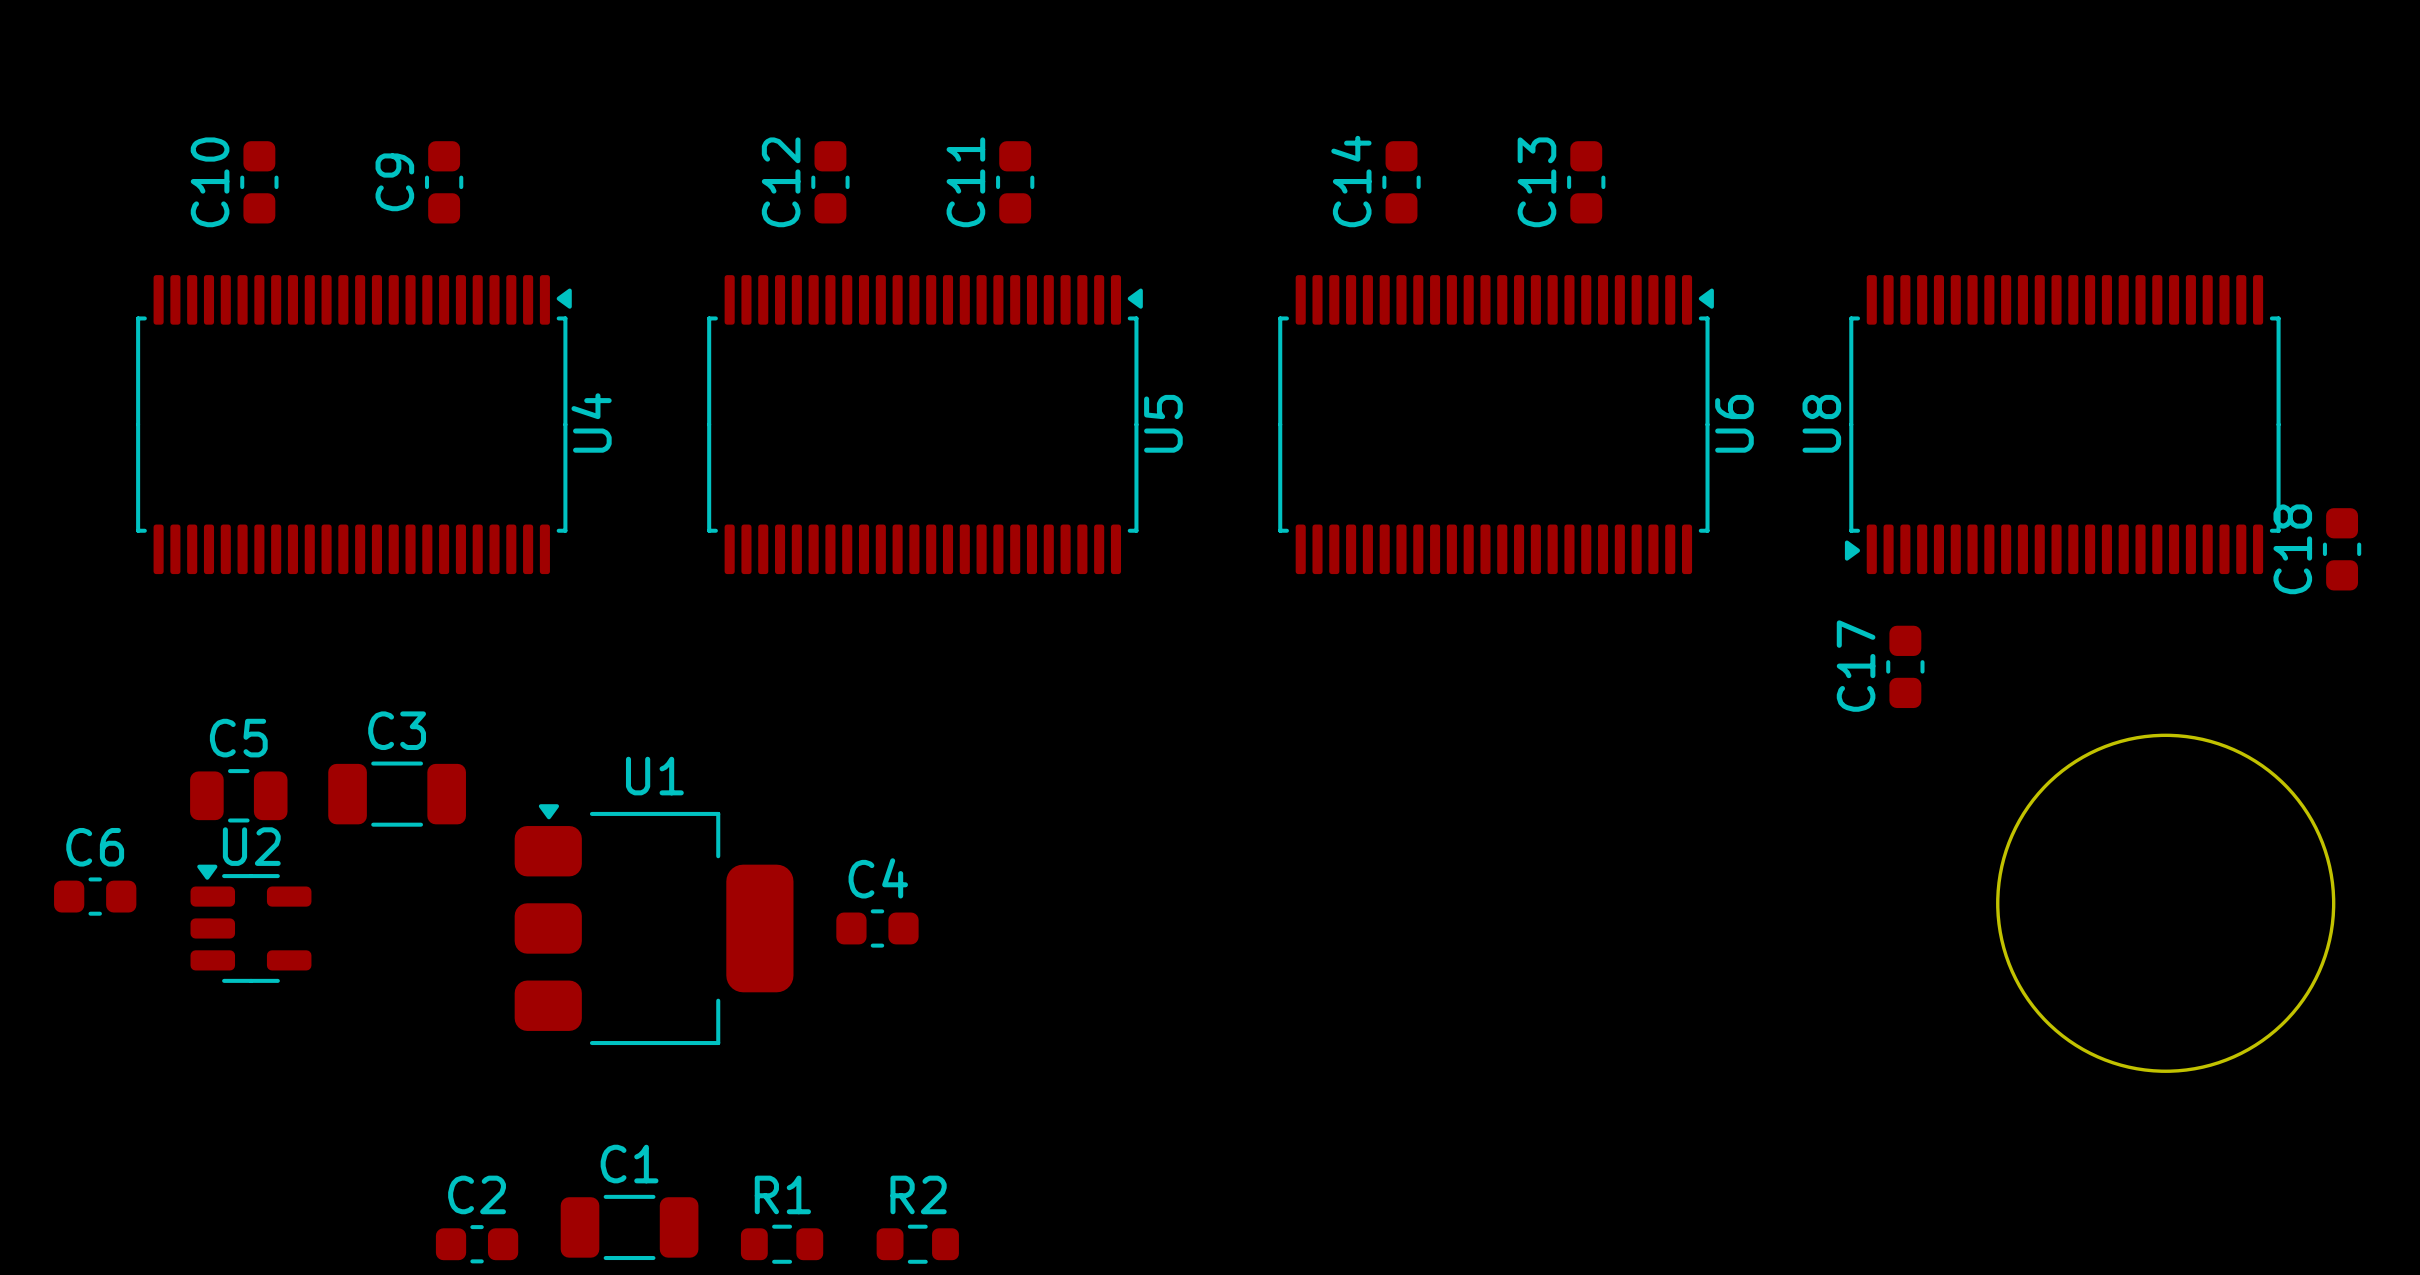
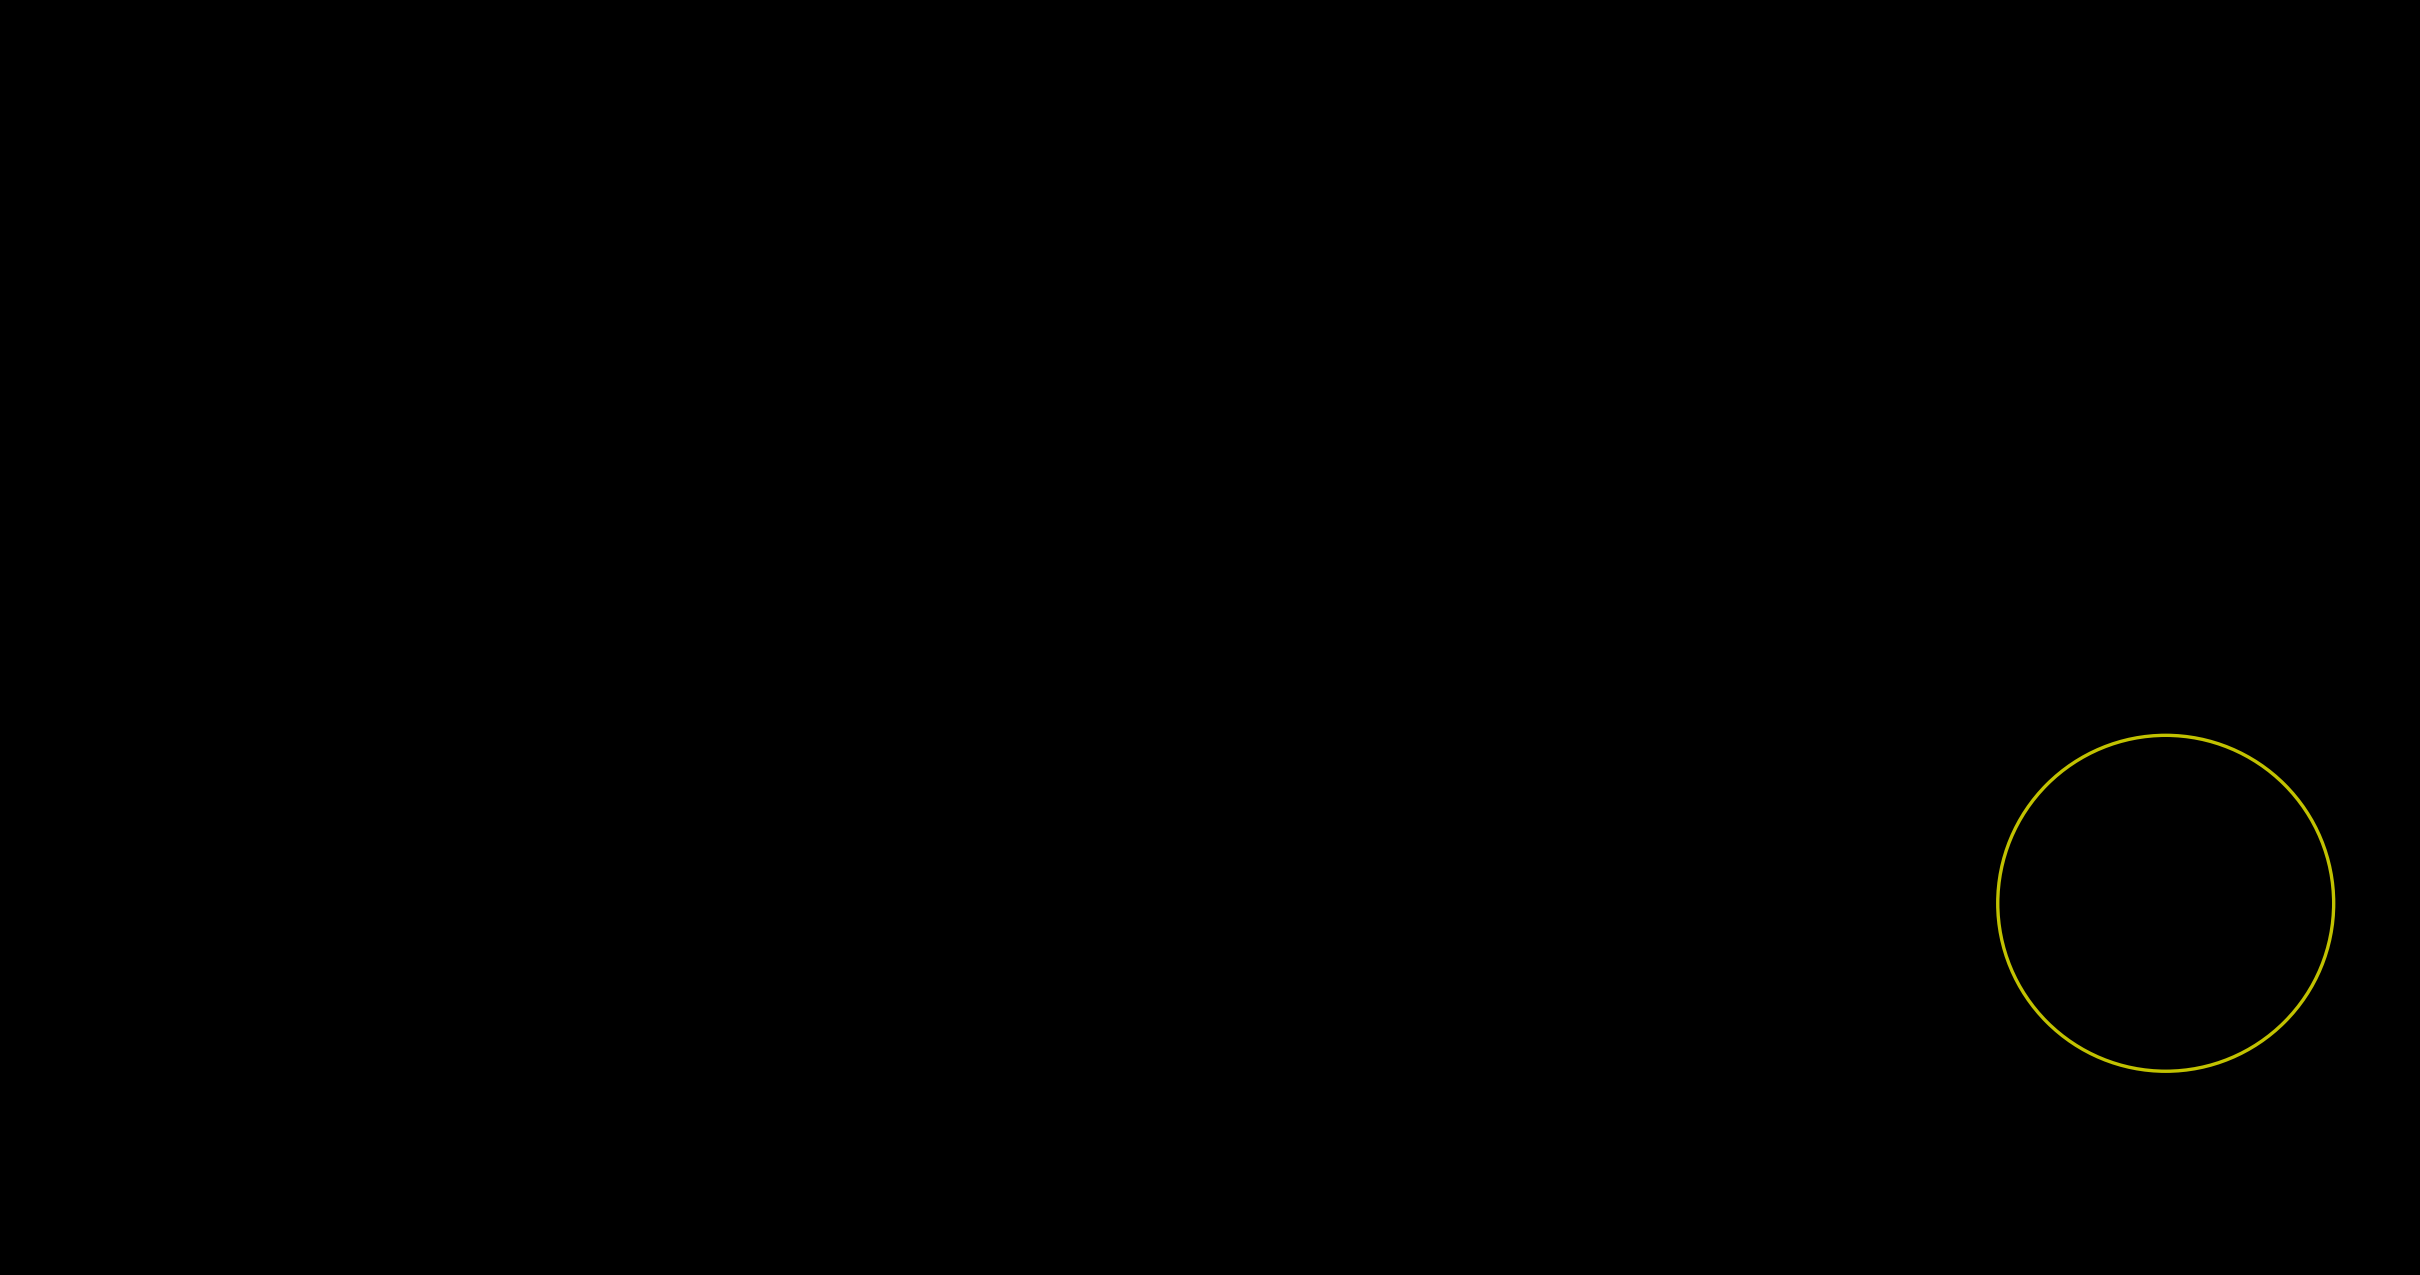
C10: (259, 182) -> none
C9: (444, 182) -> none
C12: (830, 182) -> none
C11: (1015, 182) -> none
C14: (1401, 182) -> none
C13: (1586, 182) -> none
U4: (353, 424) -> none
U5: (925, 424) -> none
U6: (1496, 424) -> none
U8: (2062, 424) -> none
C18: (2342, 549) -> none
C17: (1905, 666) -> none
C3: (397, 794) -> none
C5: (238, 795) -> none
C6: (95, 896) -> none
U2: (250, 923) -> none
U1: (654, 924) -> none
C4: (877, 928) -> none
C1: (629, 1227) -> none
C2: (477, 1244) -> none
R1: (782, 1244) -> none
R2: (917, 1244) -> none

